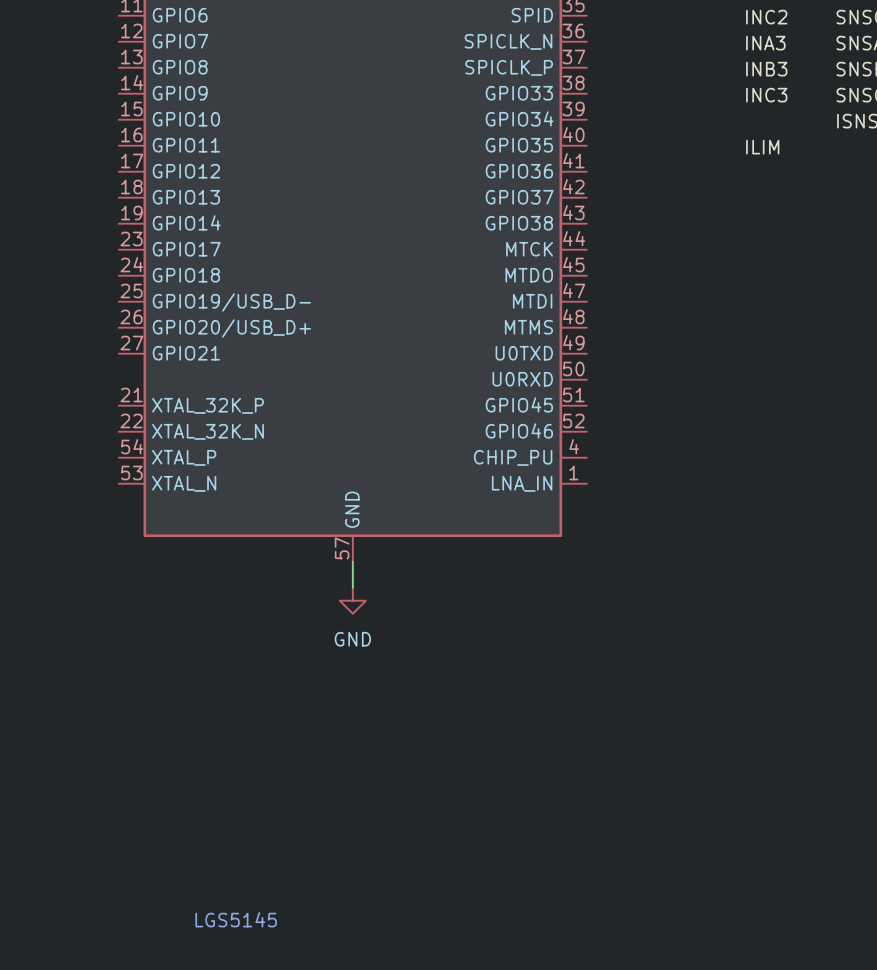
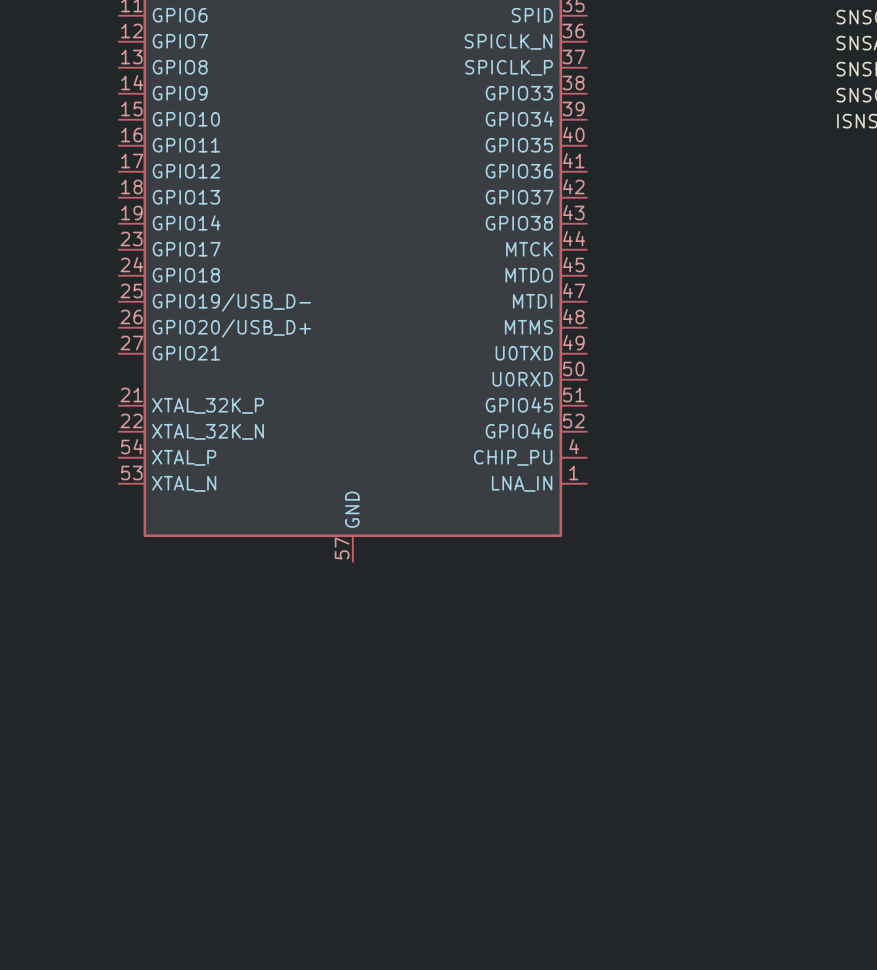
label: INC2 (766, 17) -> none
label: INA3 (765, 43) -> none
label: INB3 (766, 69) -> none
label: INC3 (766, 95) -> none
label: ILIM (762, 147) -> none
wire: (352, 561) (352, 587) -> none
power symbol: GND (352, 600) -> none
text: LGS5145 (236, 919) -> none

